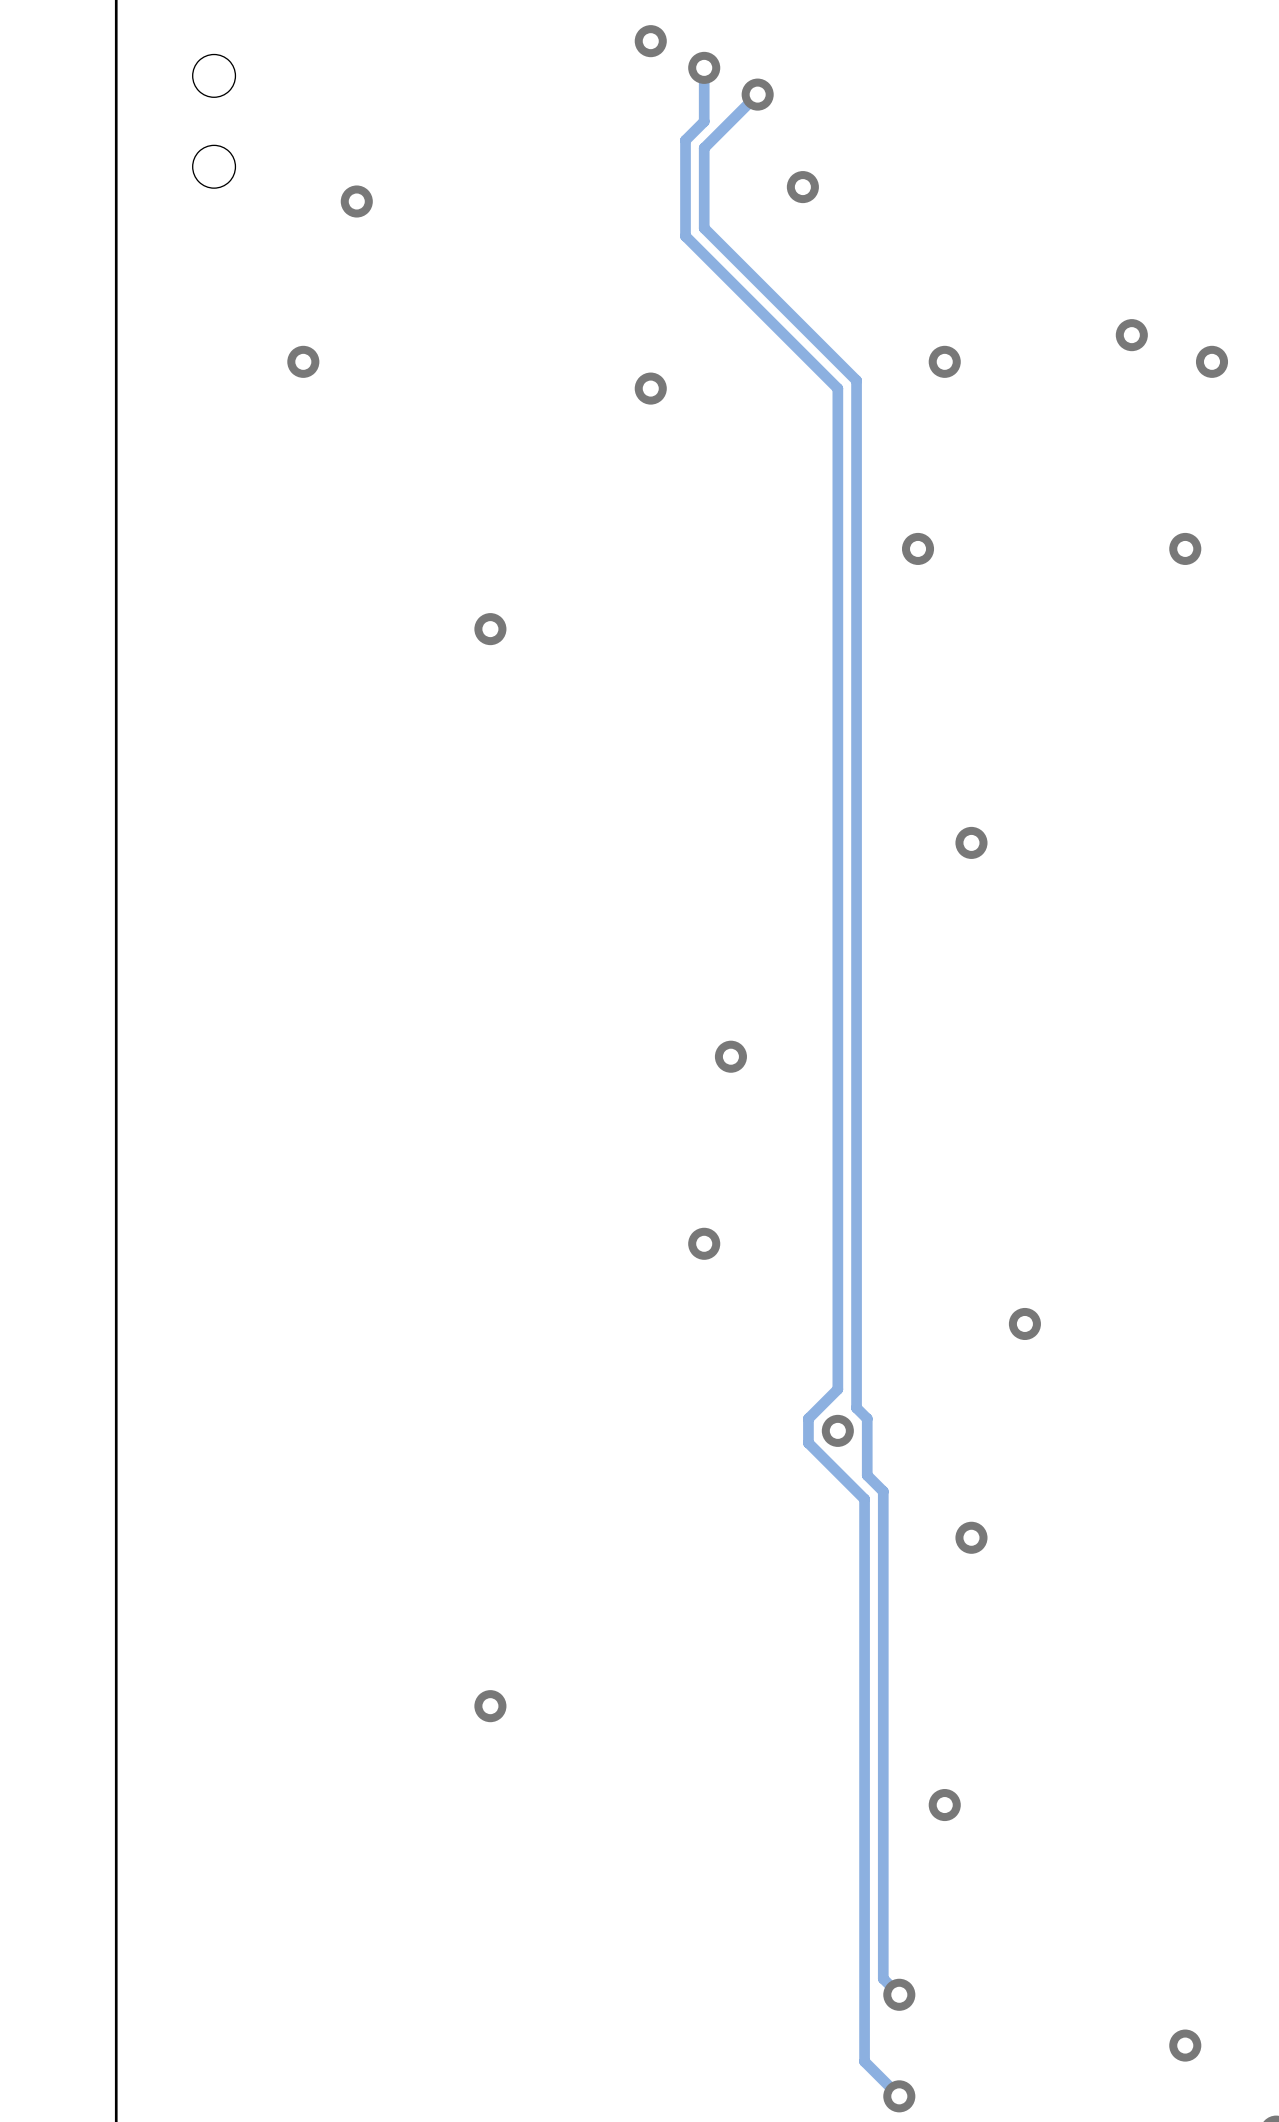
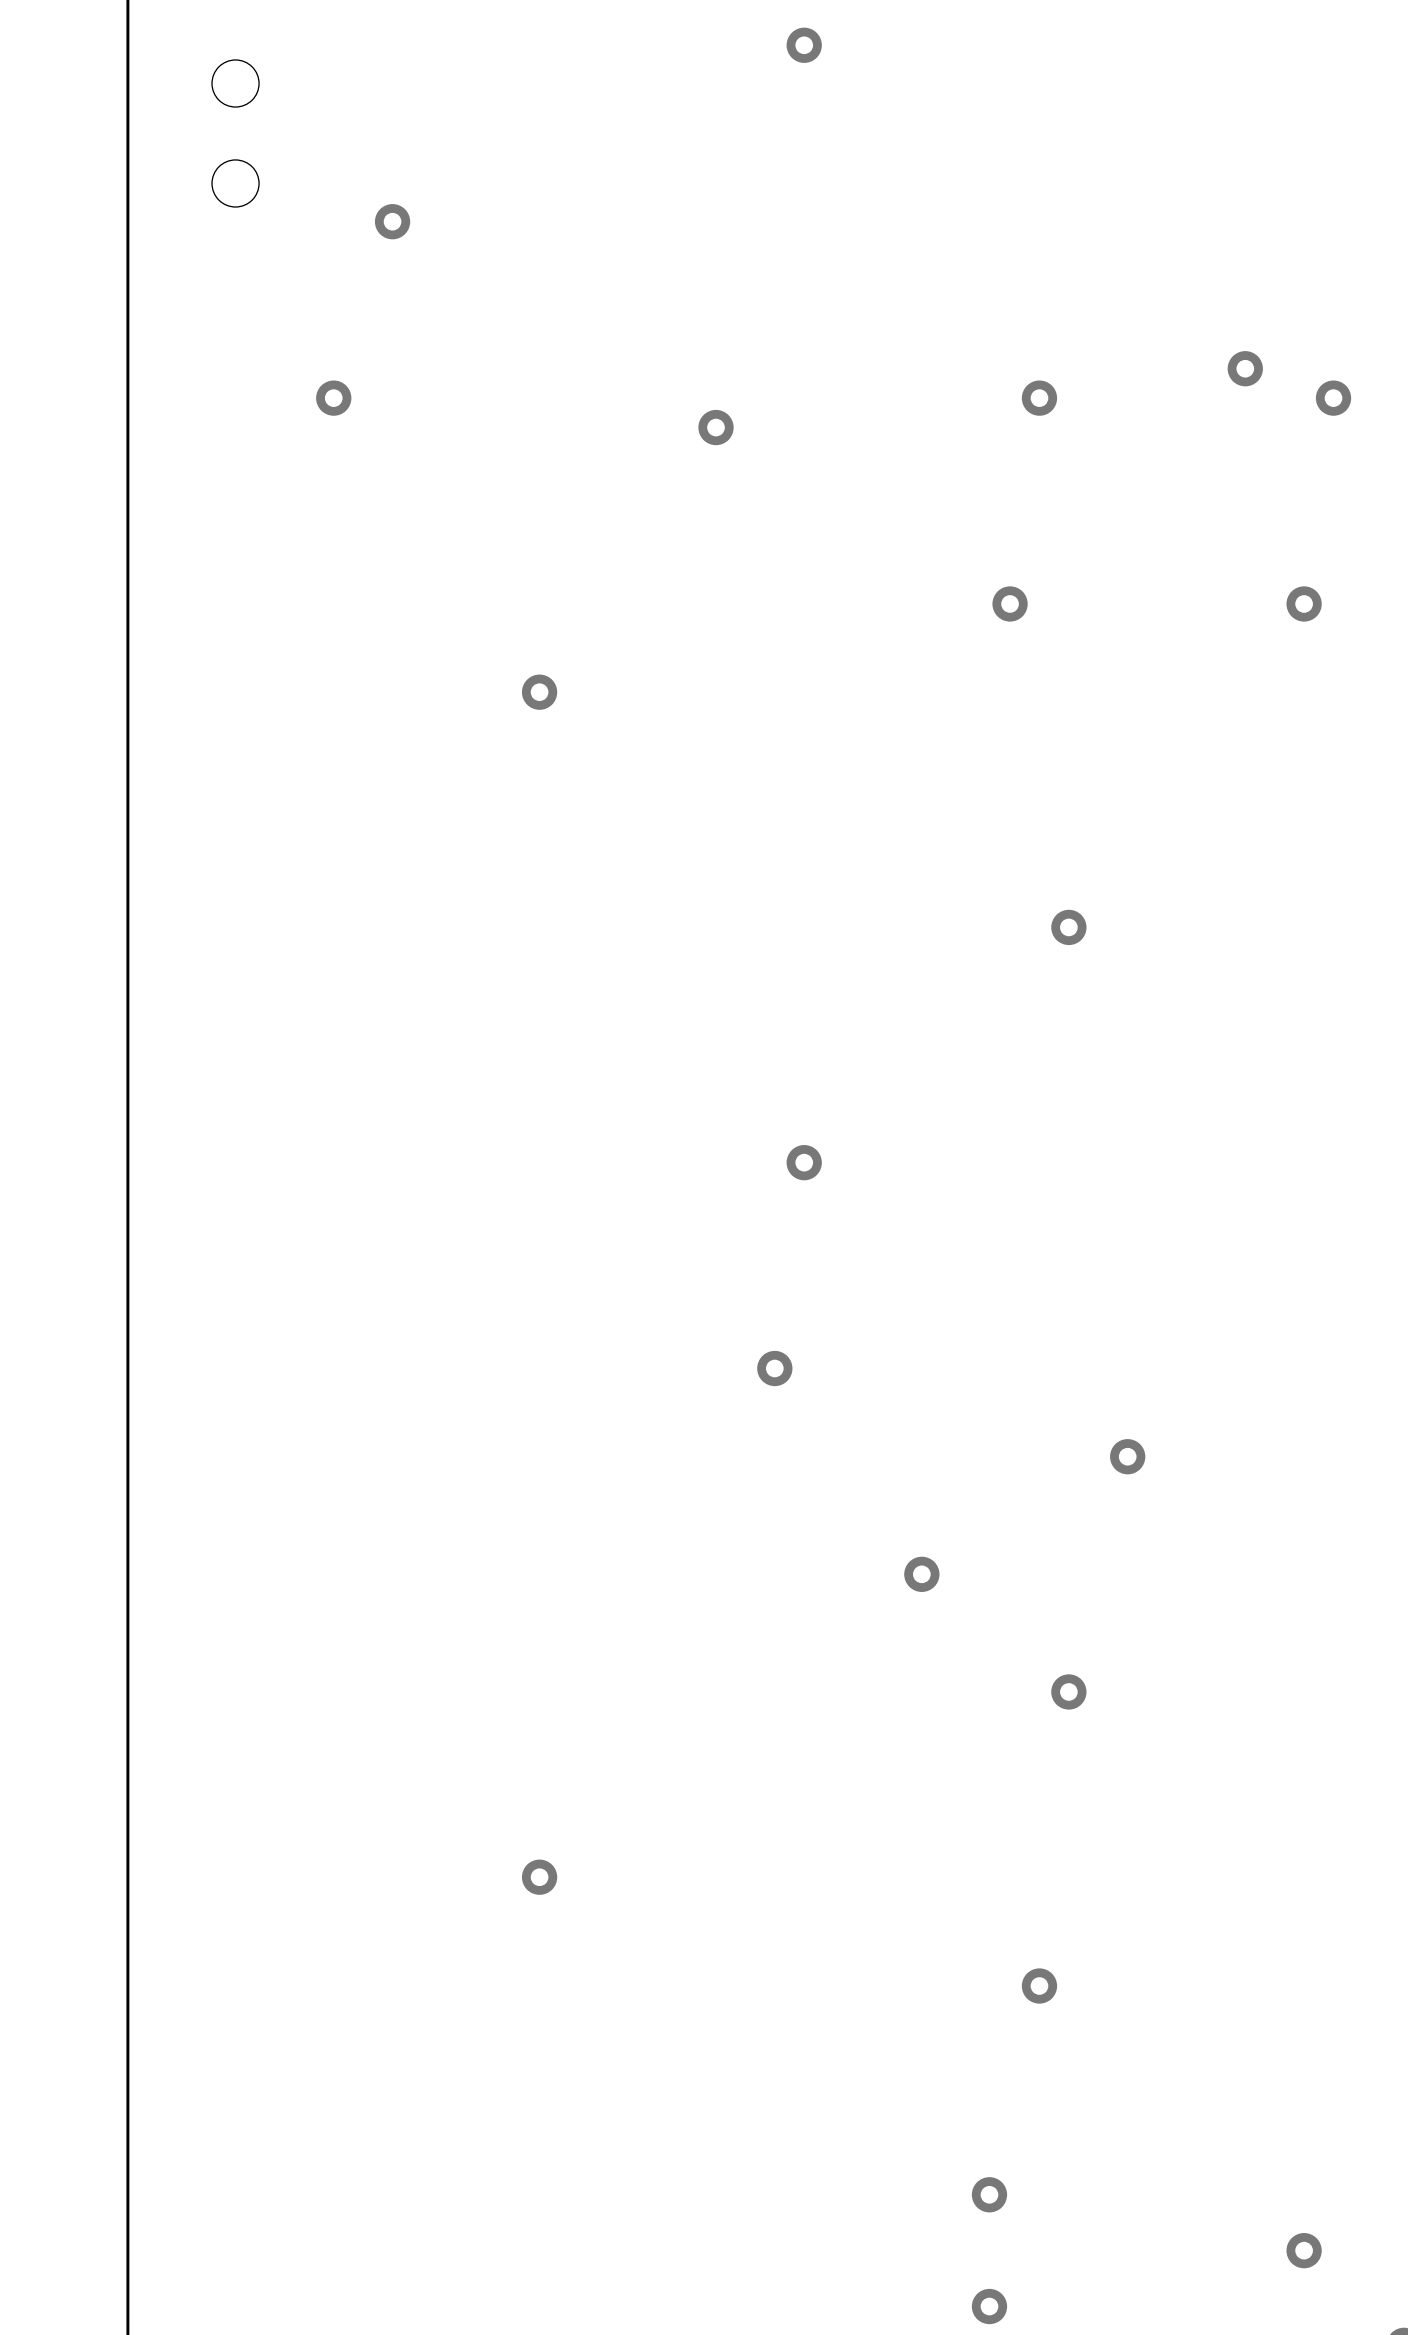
via: (650, 41) -> none
track: (704, 67) (704, 121) (685, 140) (685, 236) (837, 388) (837, 1389) (808, 1418) (808, 1443) (864, 1499) (864, 2061) (899, 2096) -> none
via position: (704, 67) -> (804, 45)
track: (757, 94) (704, 148) (704, 228) (856, 380) (856, 1408) (867, 1418) (867, 1475) (883, 1491) (883, 1978) (899, 1994) -> none
via: (757, 94) -> none
via: (802, 187) -> none

